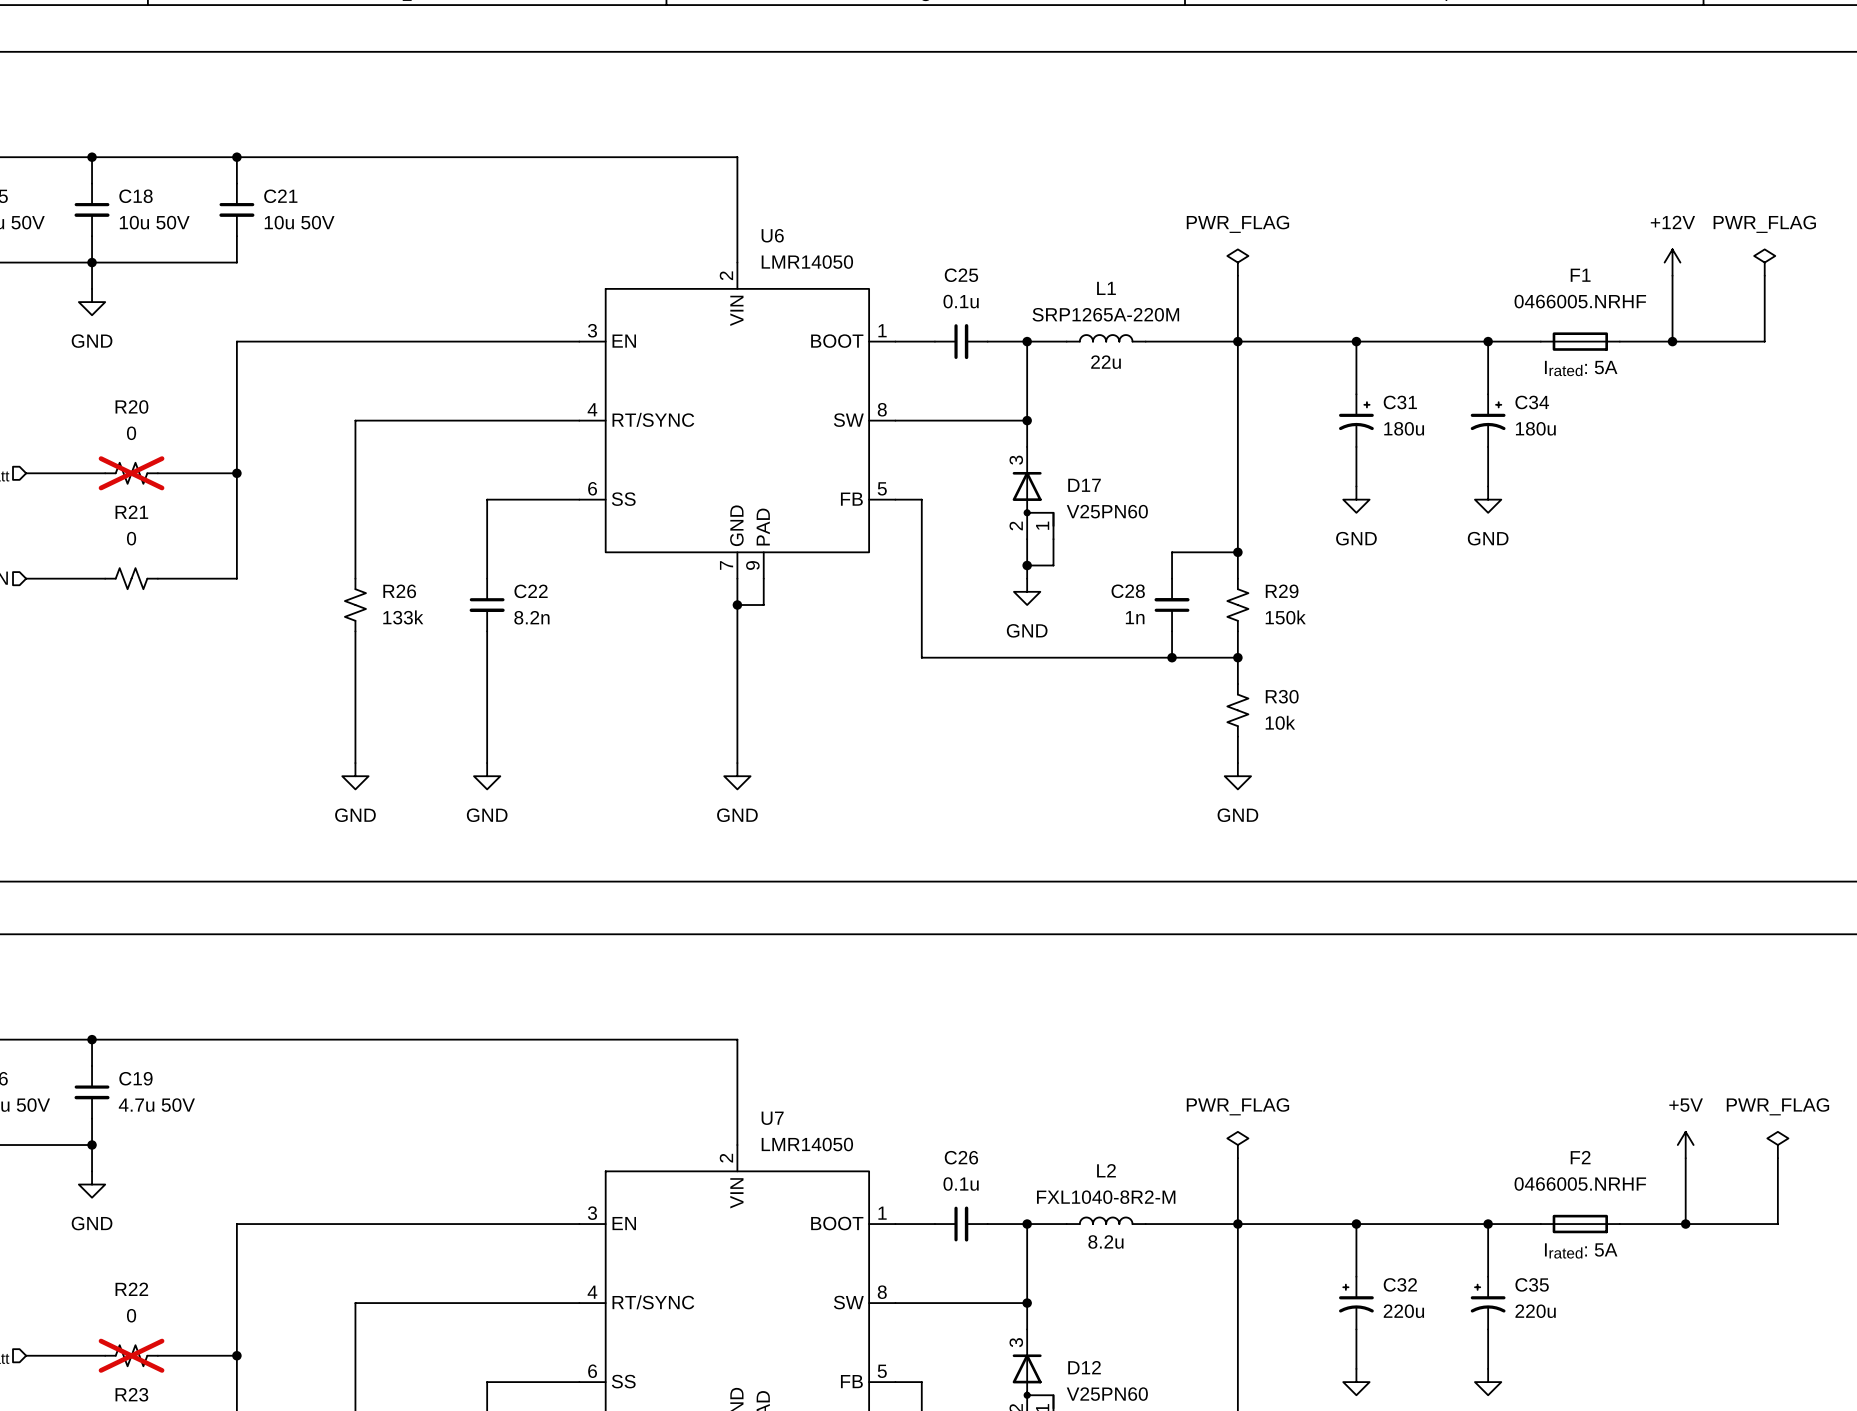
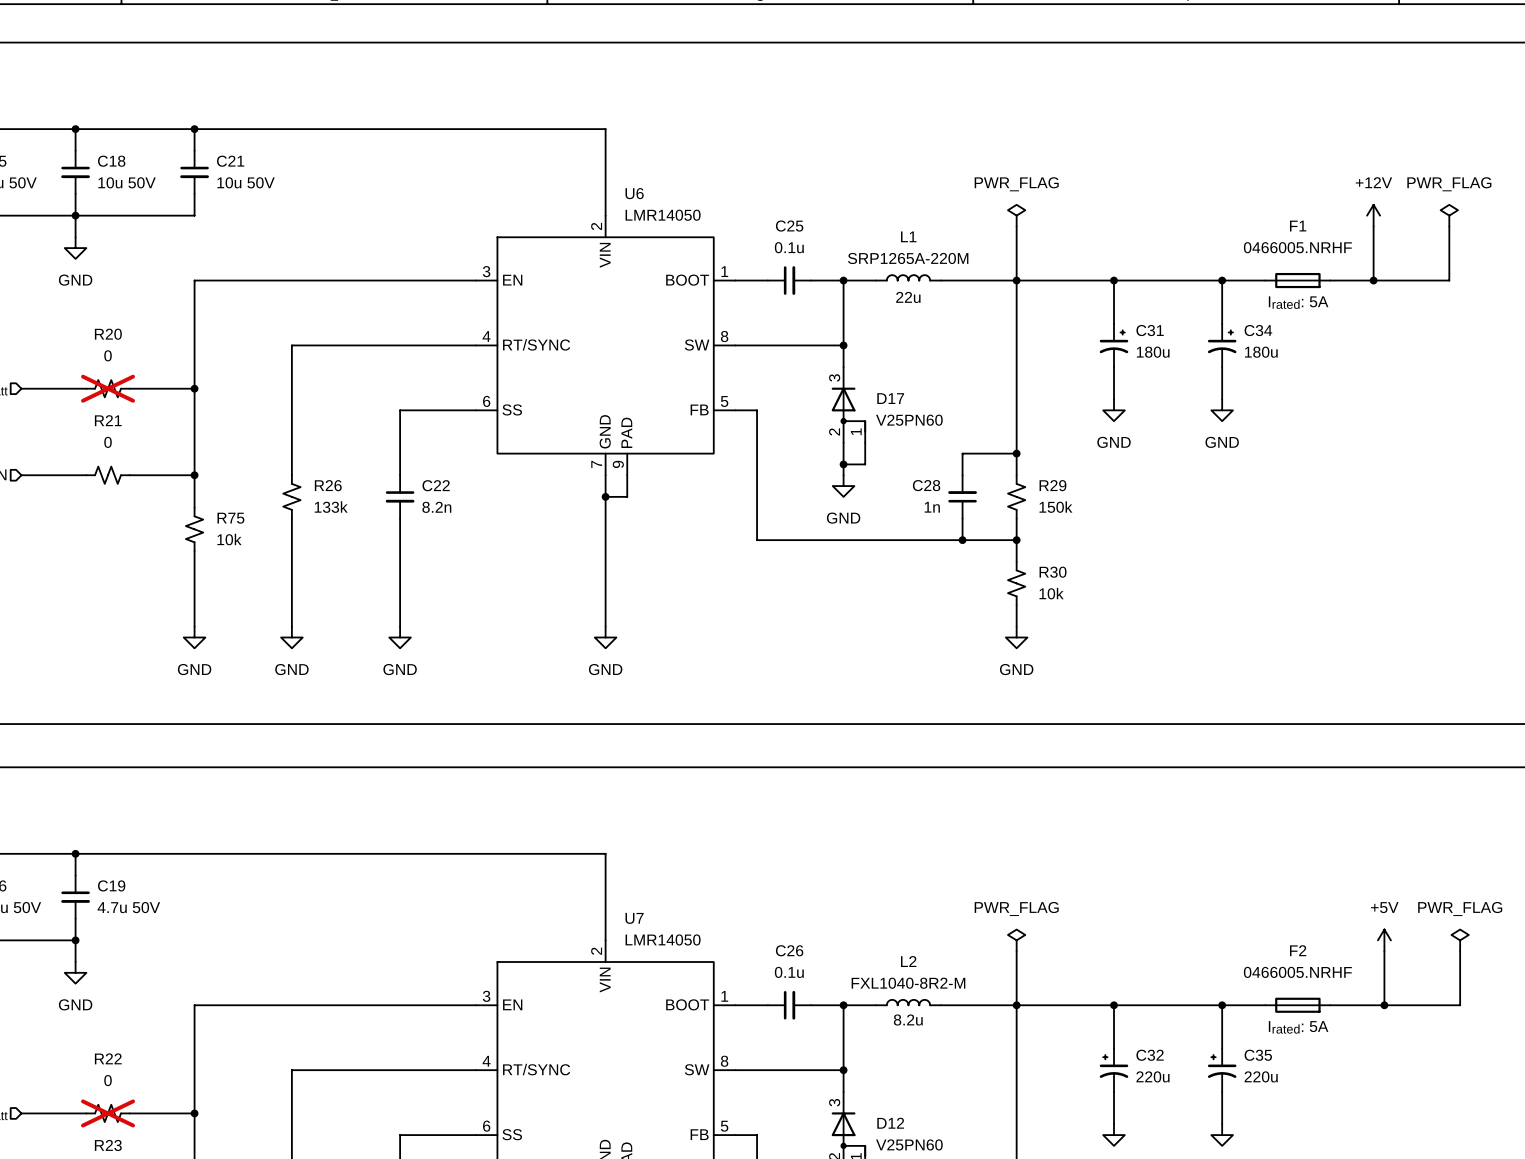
wire: none -> (194, 475) (194, 507)
junction: none -> (194, 475)
R75: none -> 10k (194, 529)
wire: none -> (194, 550) (194, 626)
power symbol: none -> GND (194, 637)

